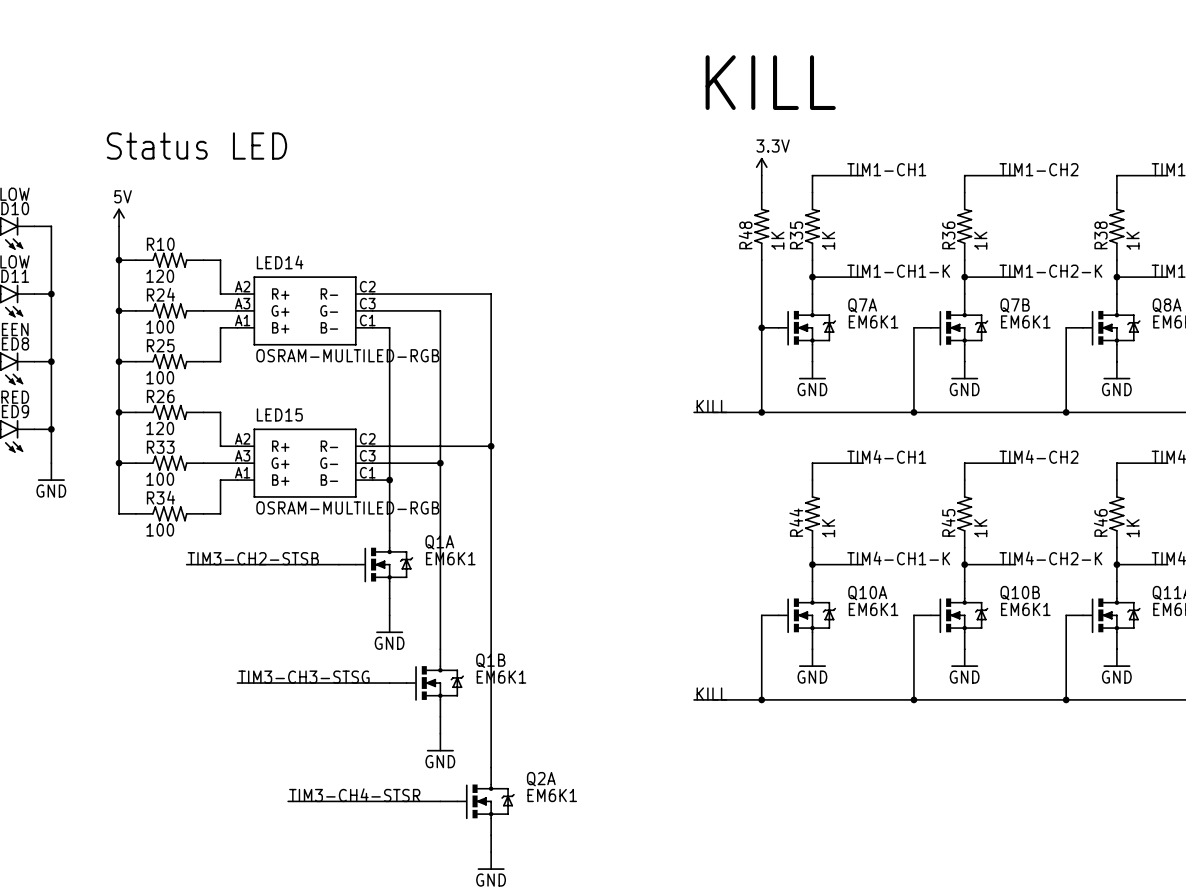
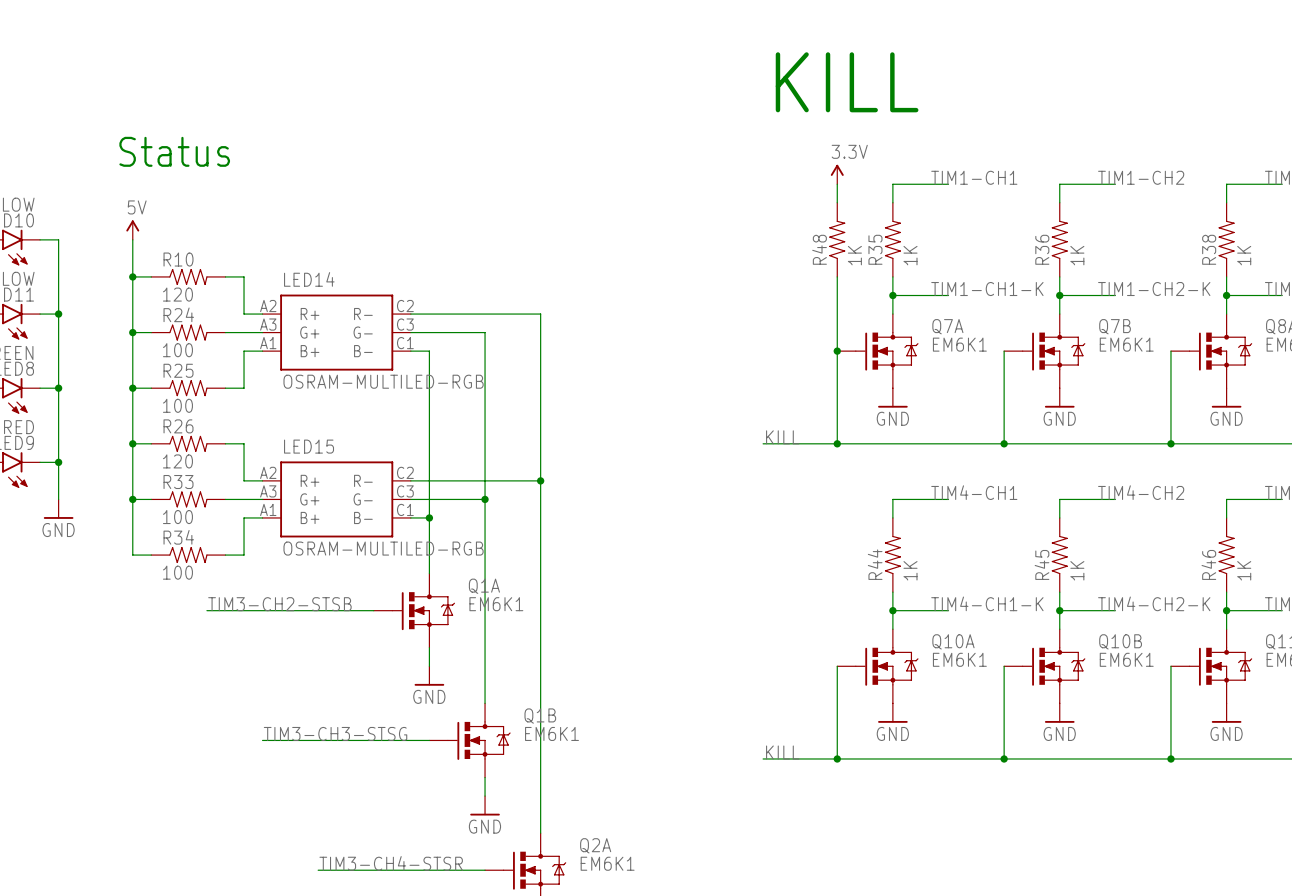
text: Status LED (196, 146) -> Status (174, 151)

